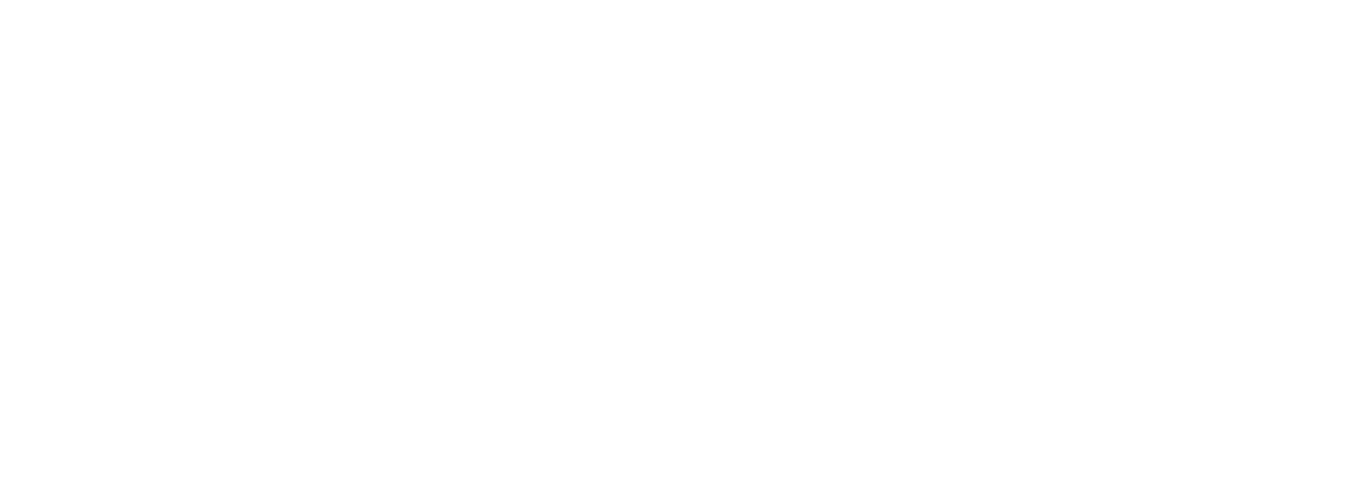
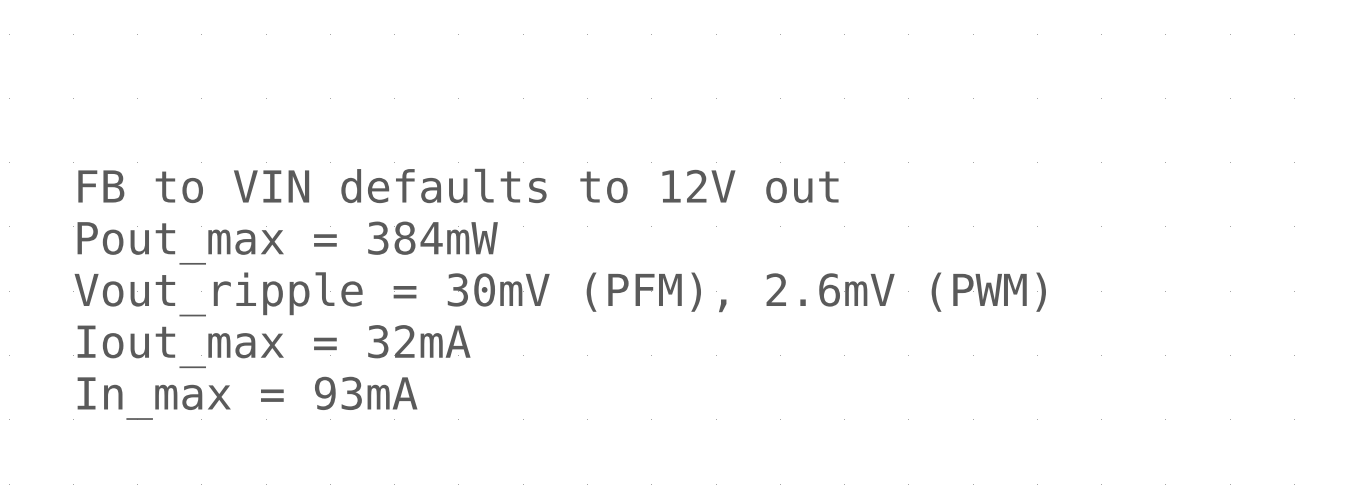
text: none -> FB to VIN defaults to 12V out (458, 185)
text: none -> Pout_max = 384mW (287, 243)
text: none -> Vout_ripple = 30mV (PFM), 2.6mV (PWM) (560, 294)
text: none -> Iout_max = 32mA (274, 346)
text: none -> In_max = 93mA (247, 398)

